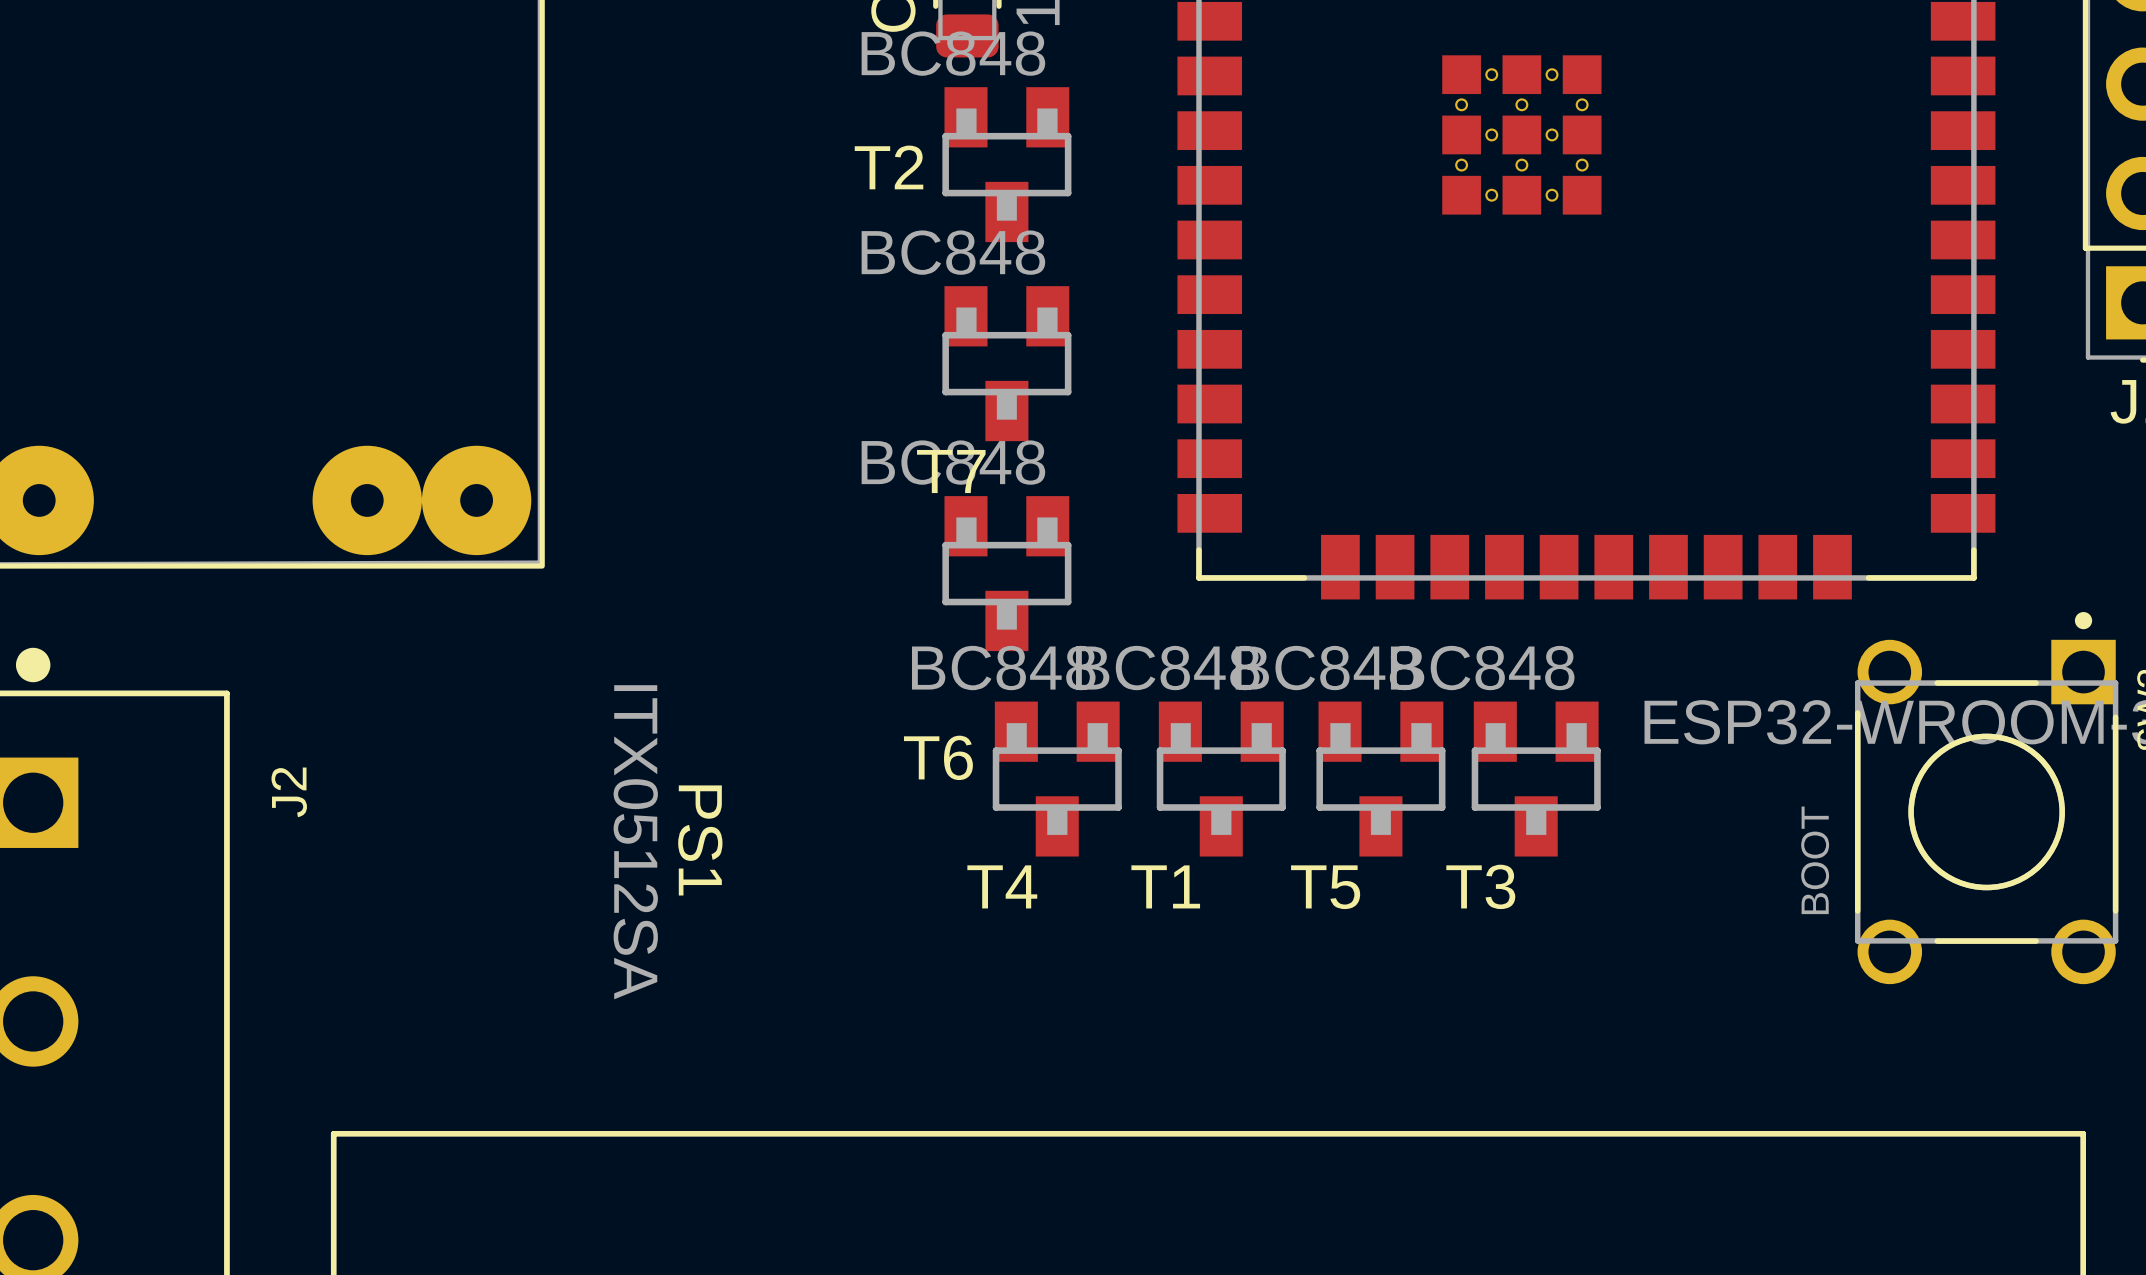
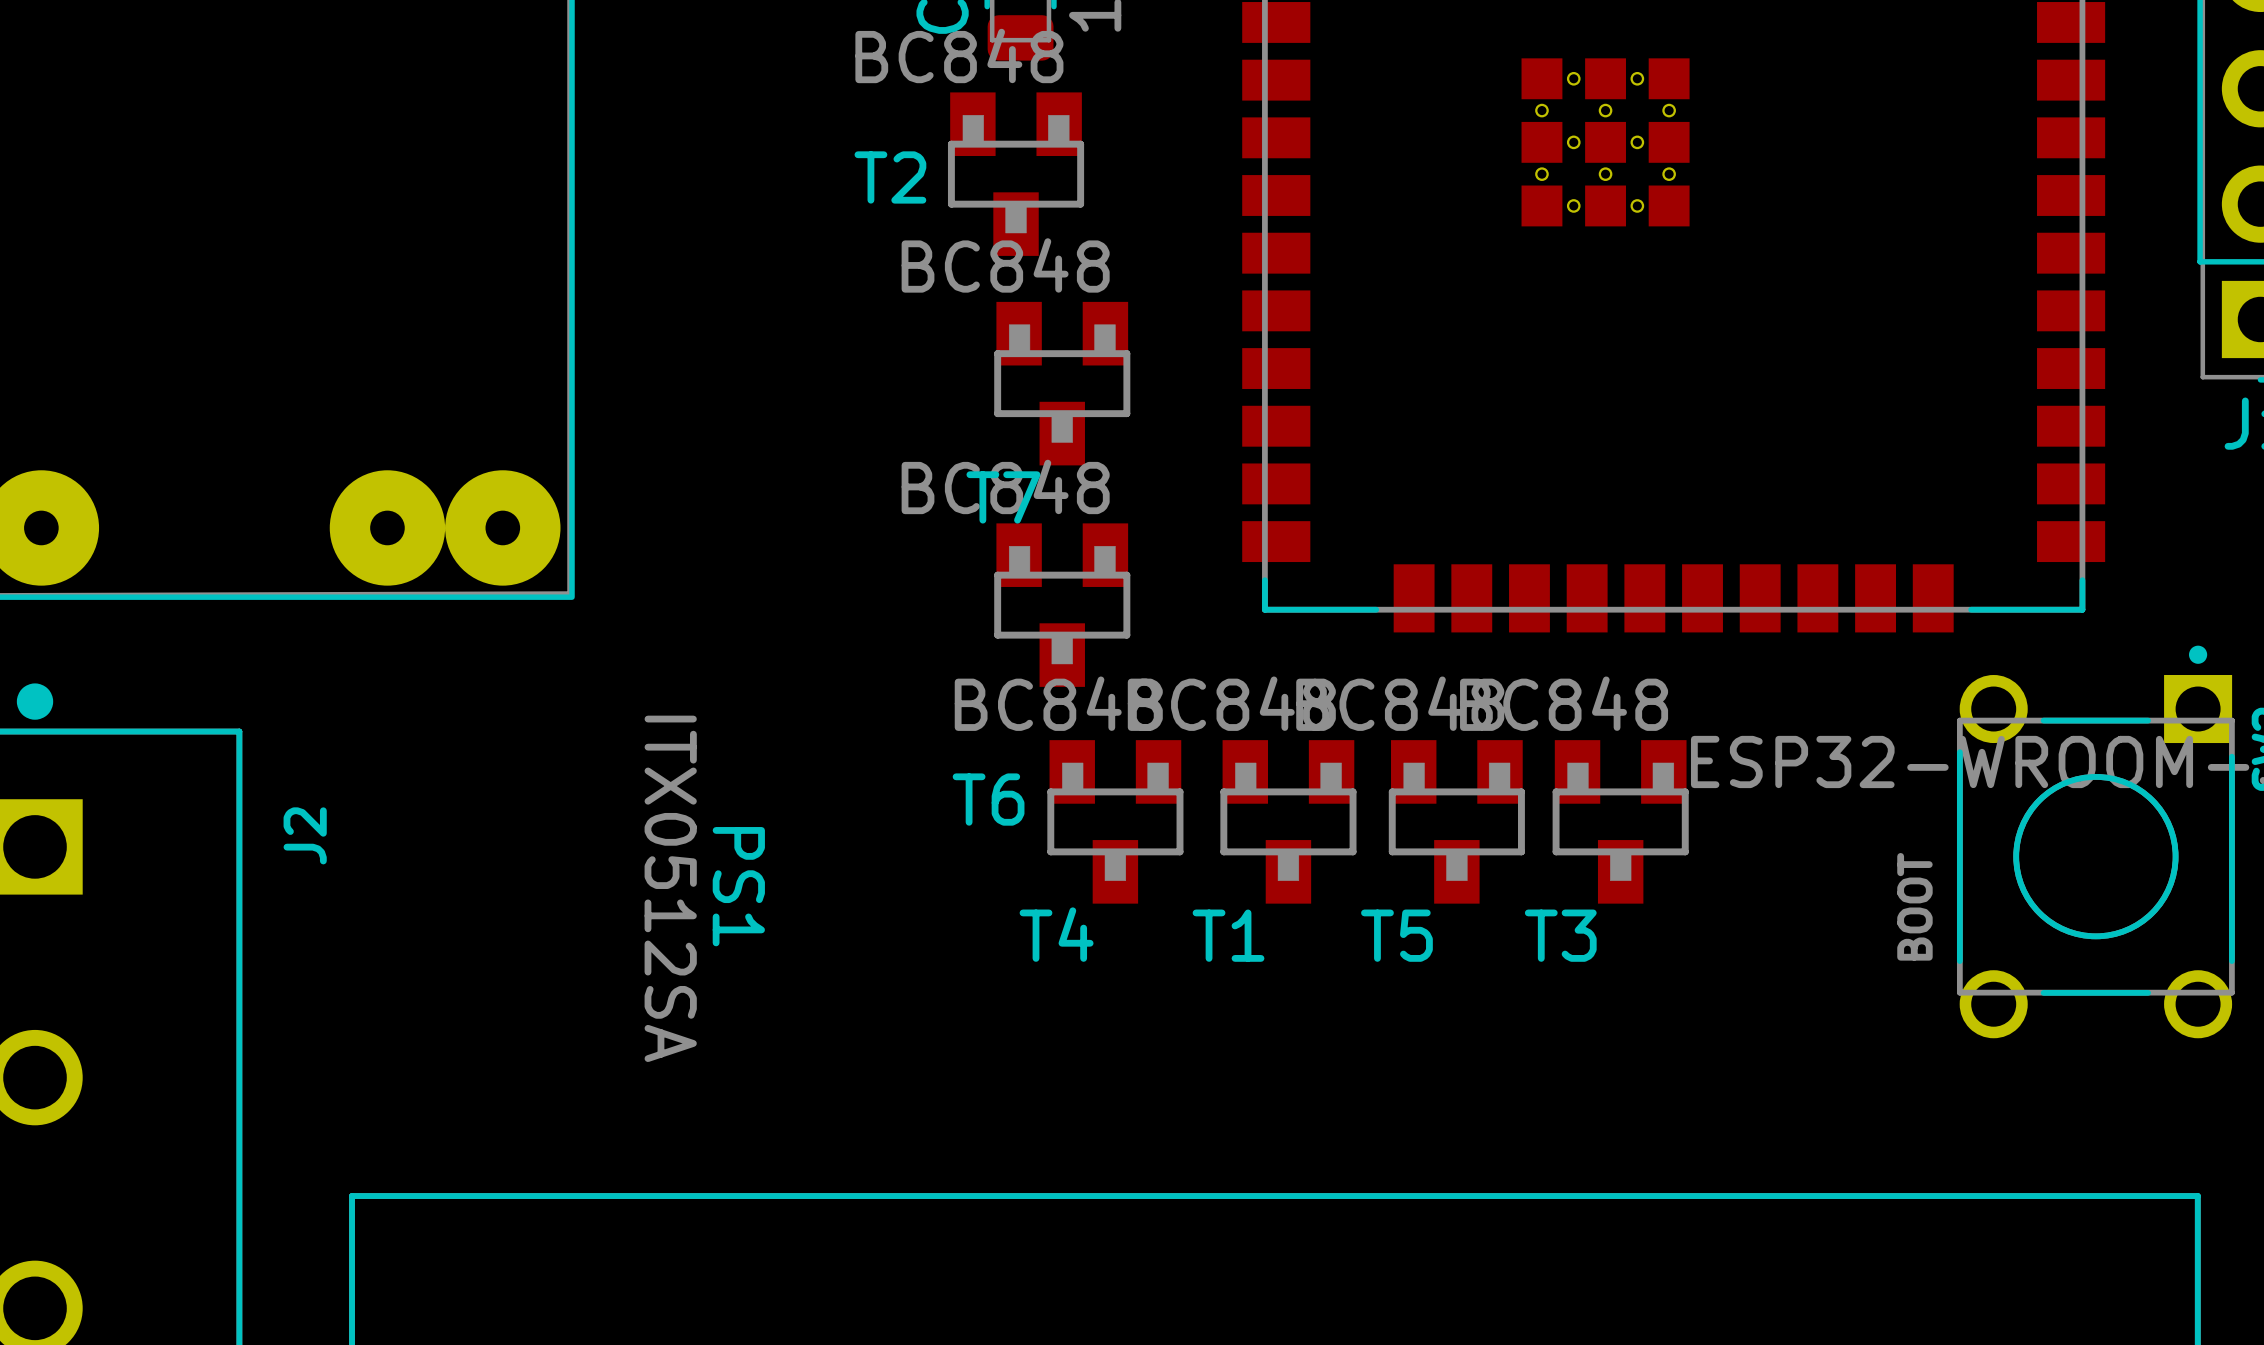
T2 position: (1006, 164) -> (1016, 174)

